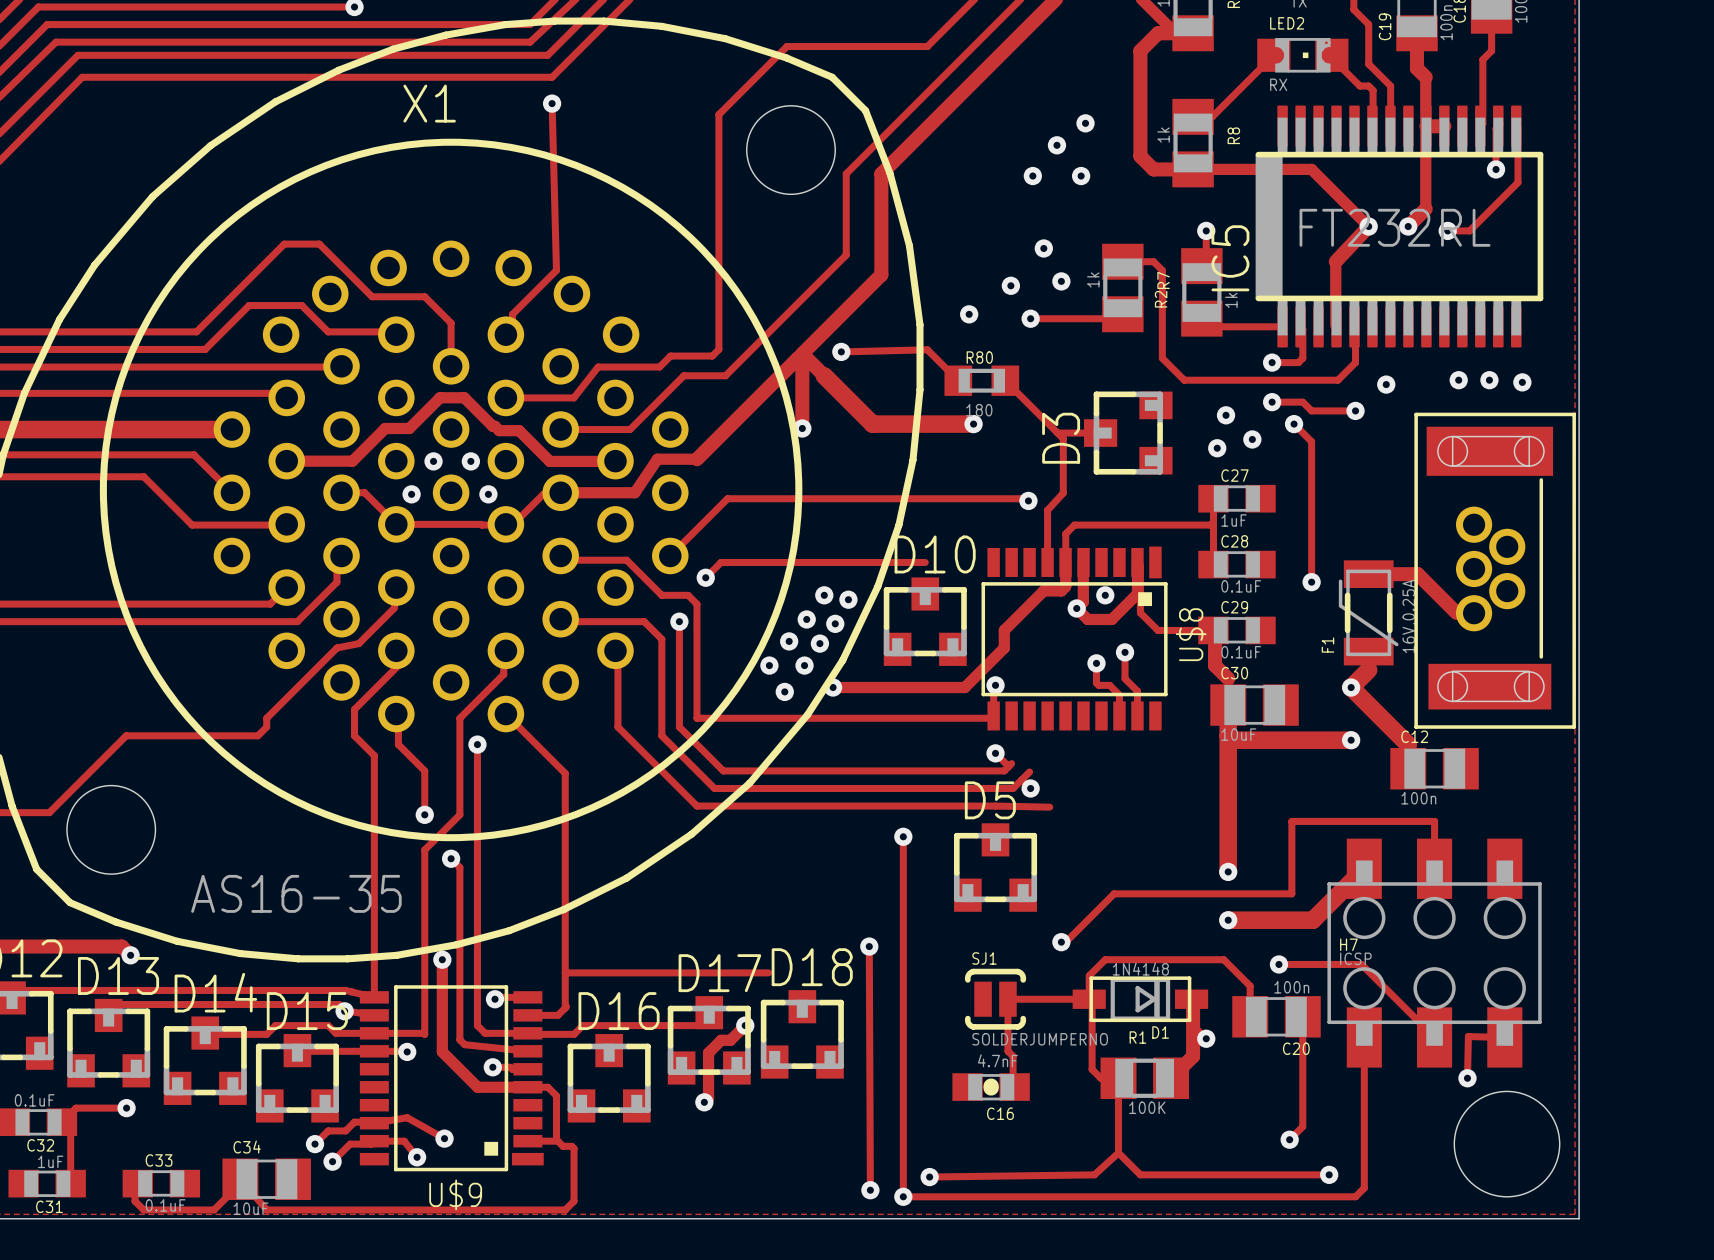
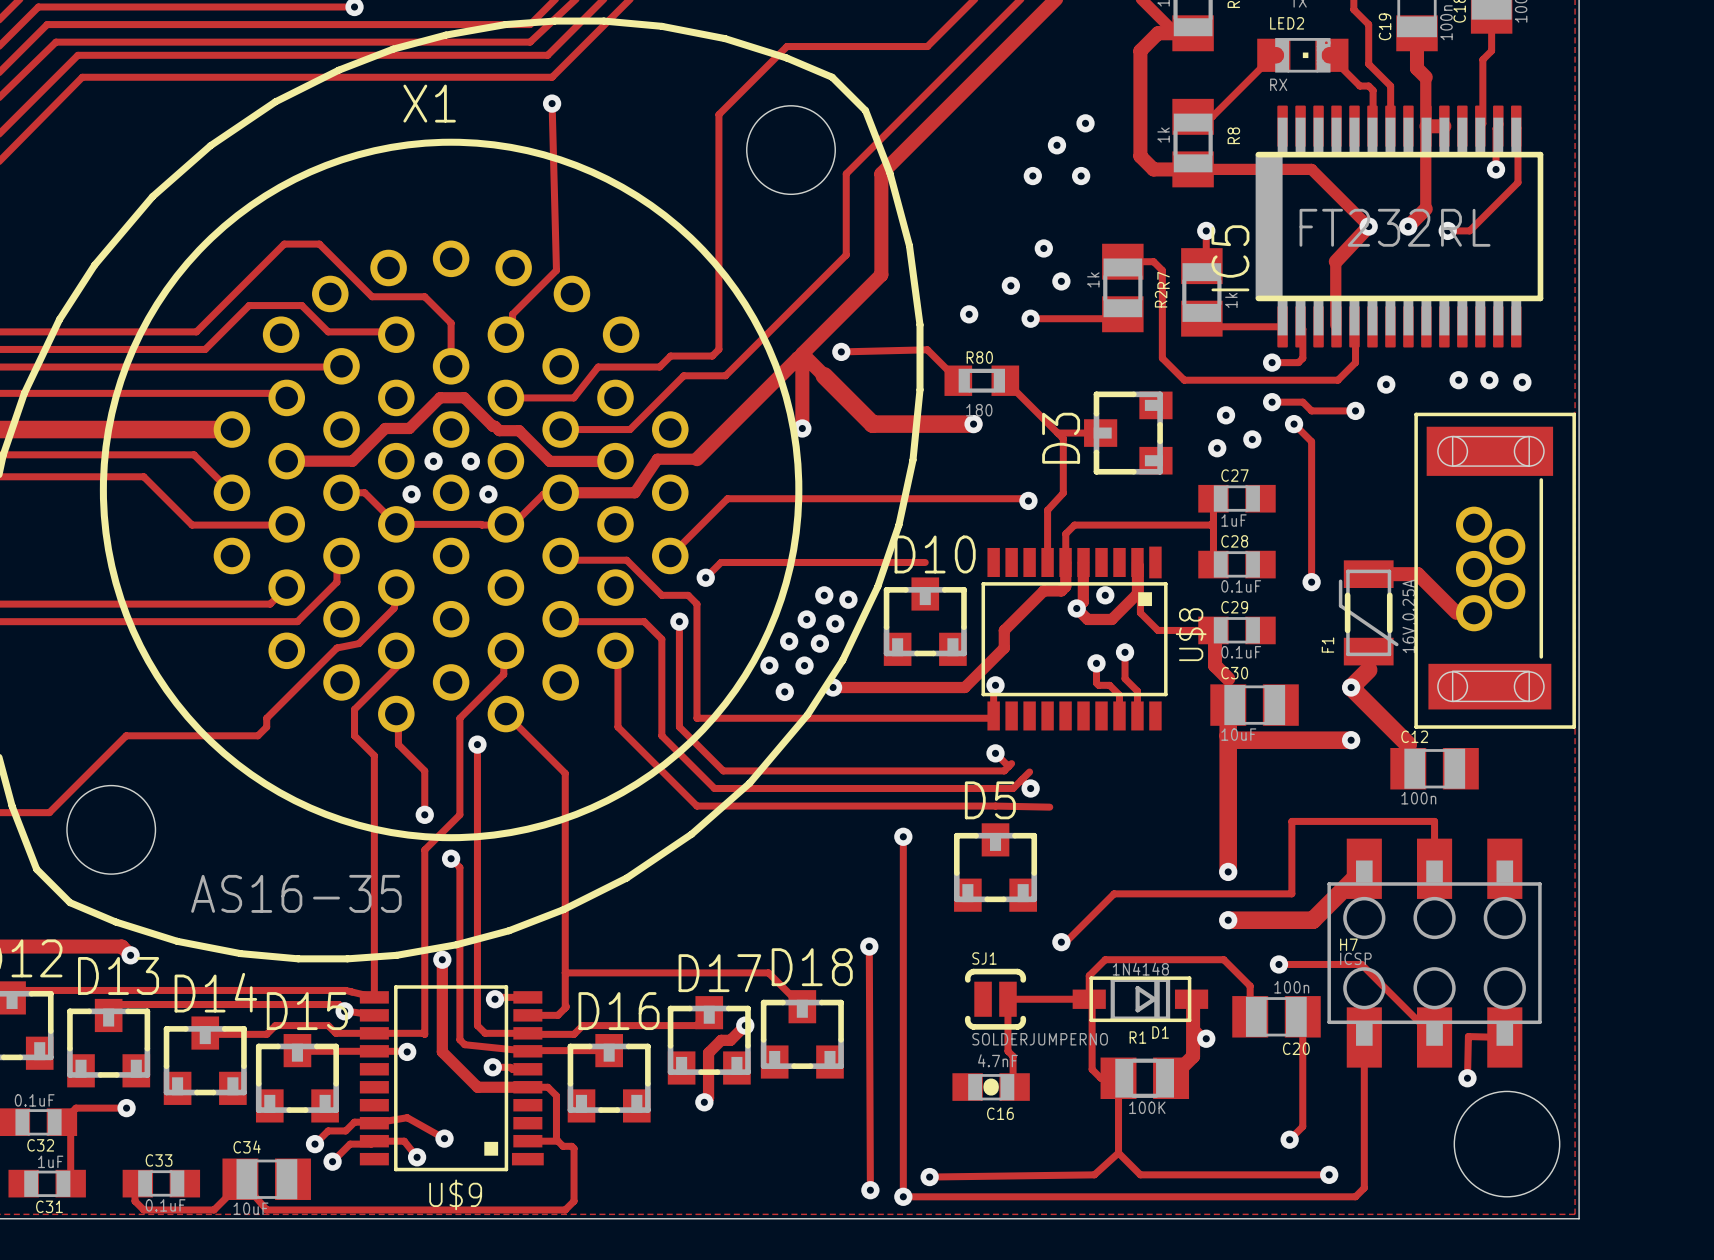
track: none -> (768, 972) (802, 1006)
track: none -> (528, 1050) (609, 1050)

